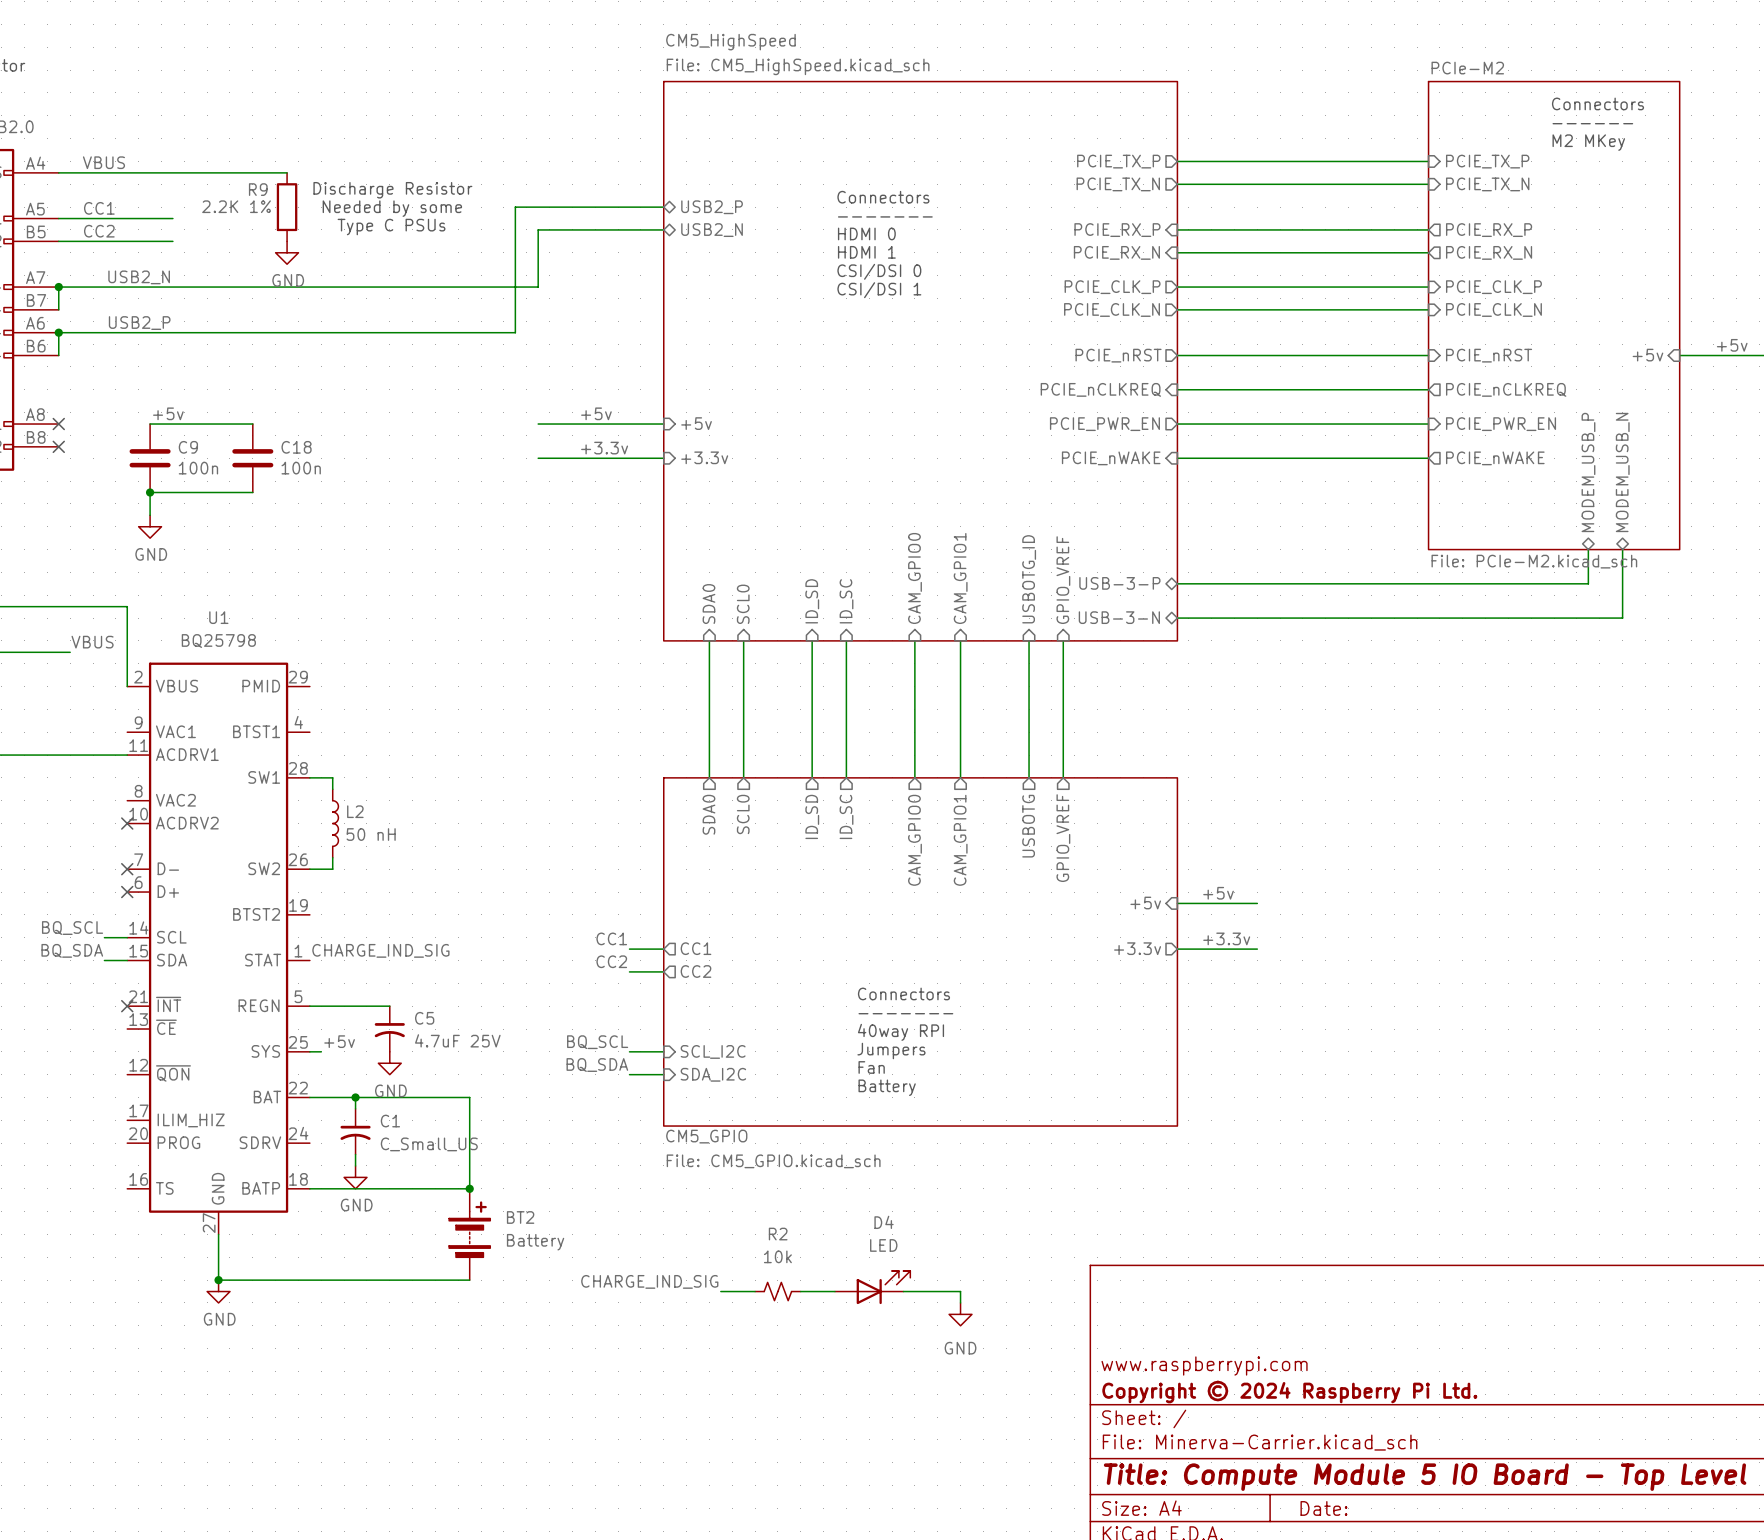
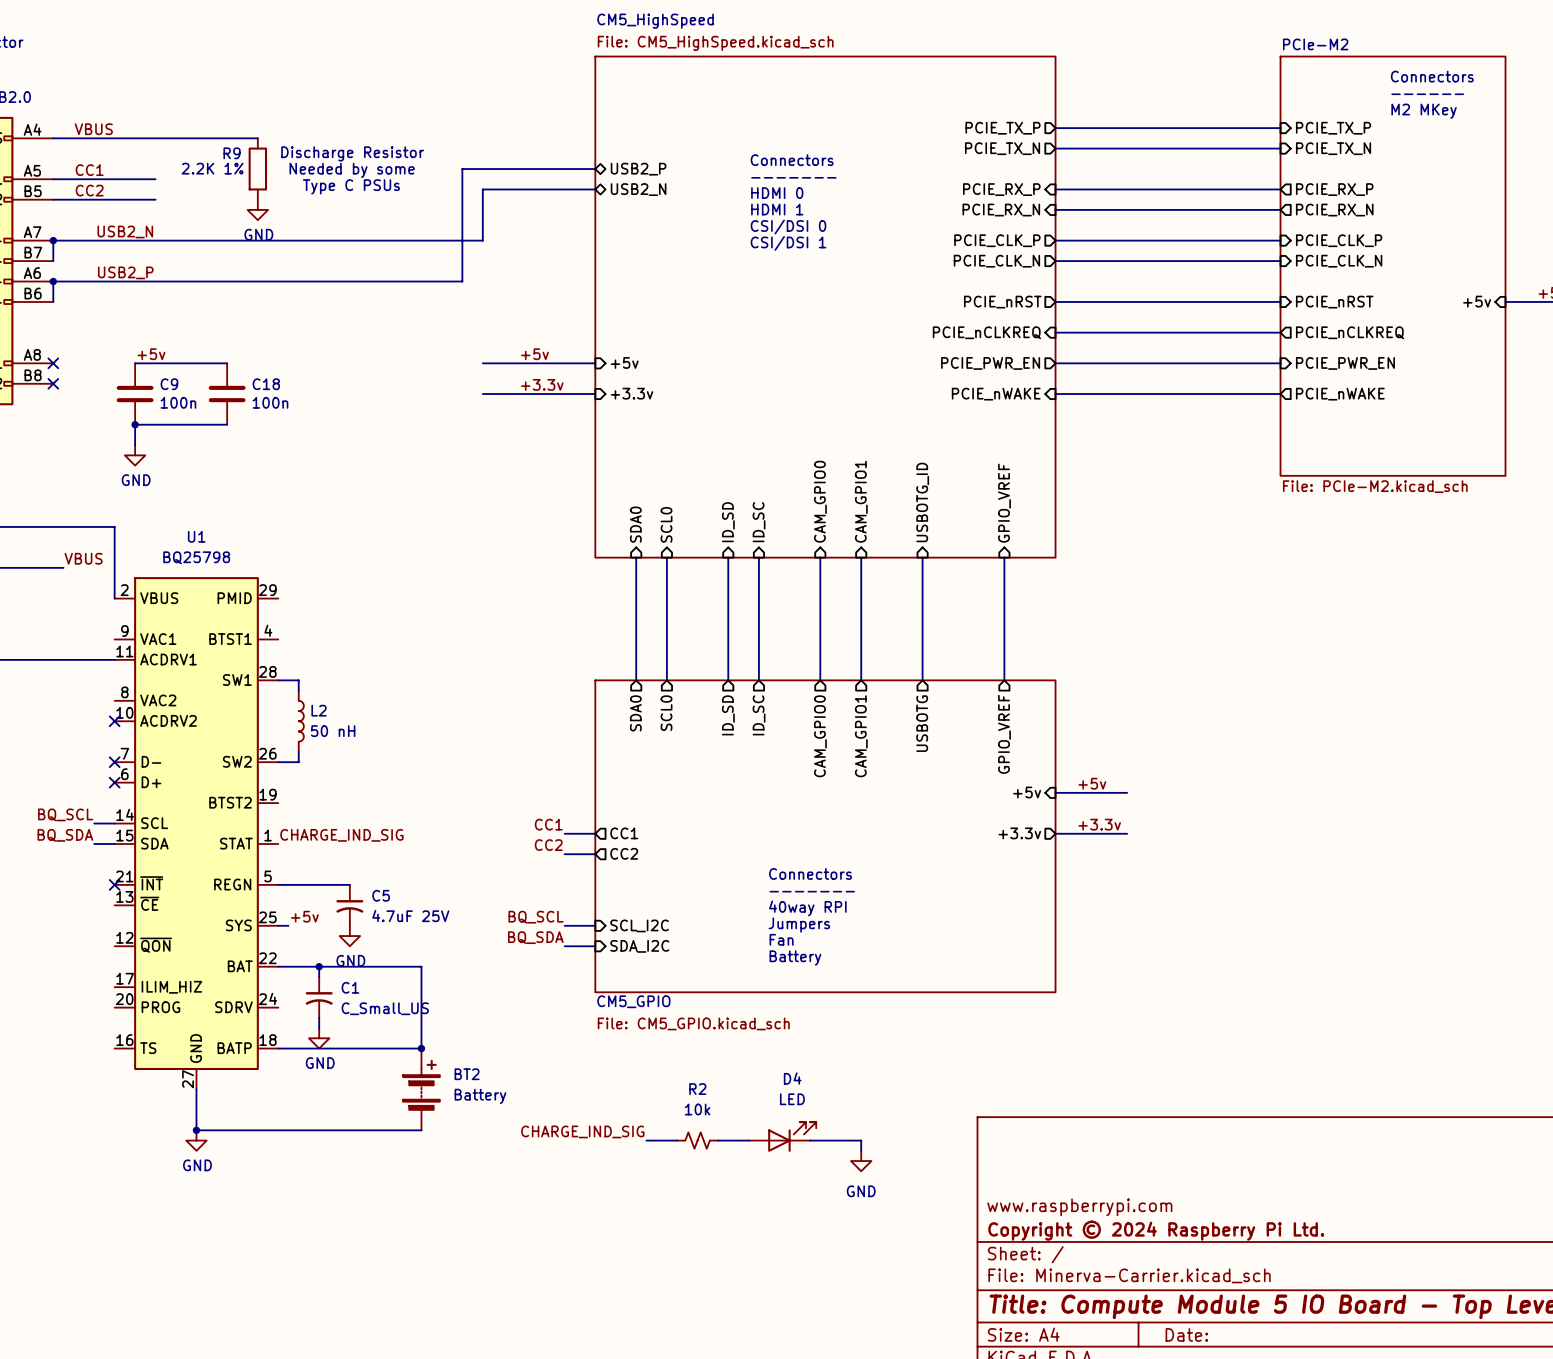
sheet pin: MODEM_USB_P (1588, 472) -> none
sheet pin: MODEM_USB_N (1622, 472) -> none
wire: (1588, 549) (1588, 583) (1177, 583) -> none
wire: (1622, 549) (1622, 618) (1177, 618) -> none
sheet pin position: GPIO_VREF (1063, 580) -> GPIO_VREF (1004, 503)
sheet pin: USB-3-P (1119, 583) -> none
sheet pin: USB-3-N (1119, 617) -> none
wire: (1063, 640) (1063, 777) -> (1004, 557) (1004, 680)
sheet pin position: GPIO_VREF (1063, 838) -> GPIO_VREF (1004, 734)

